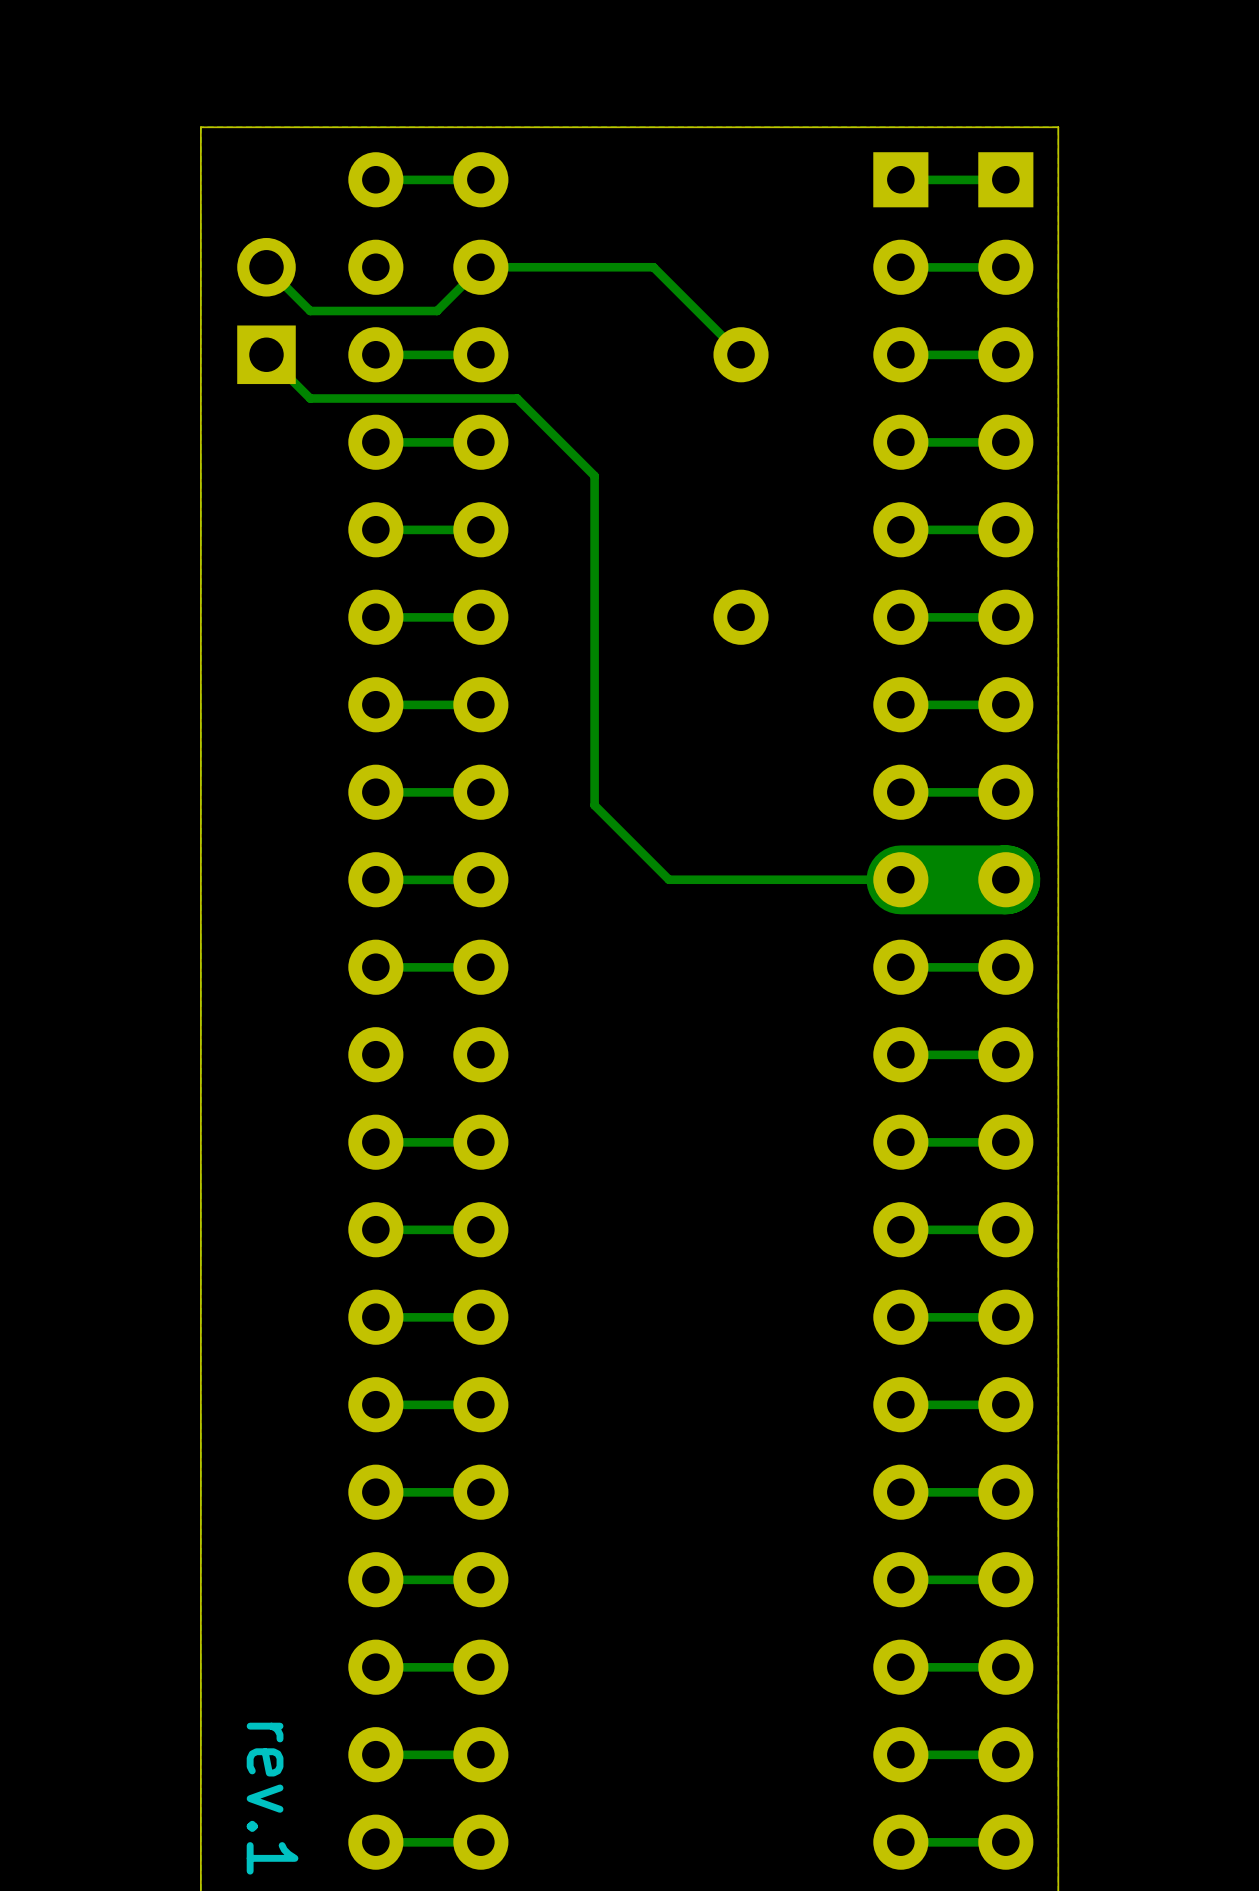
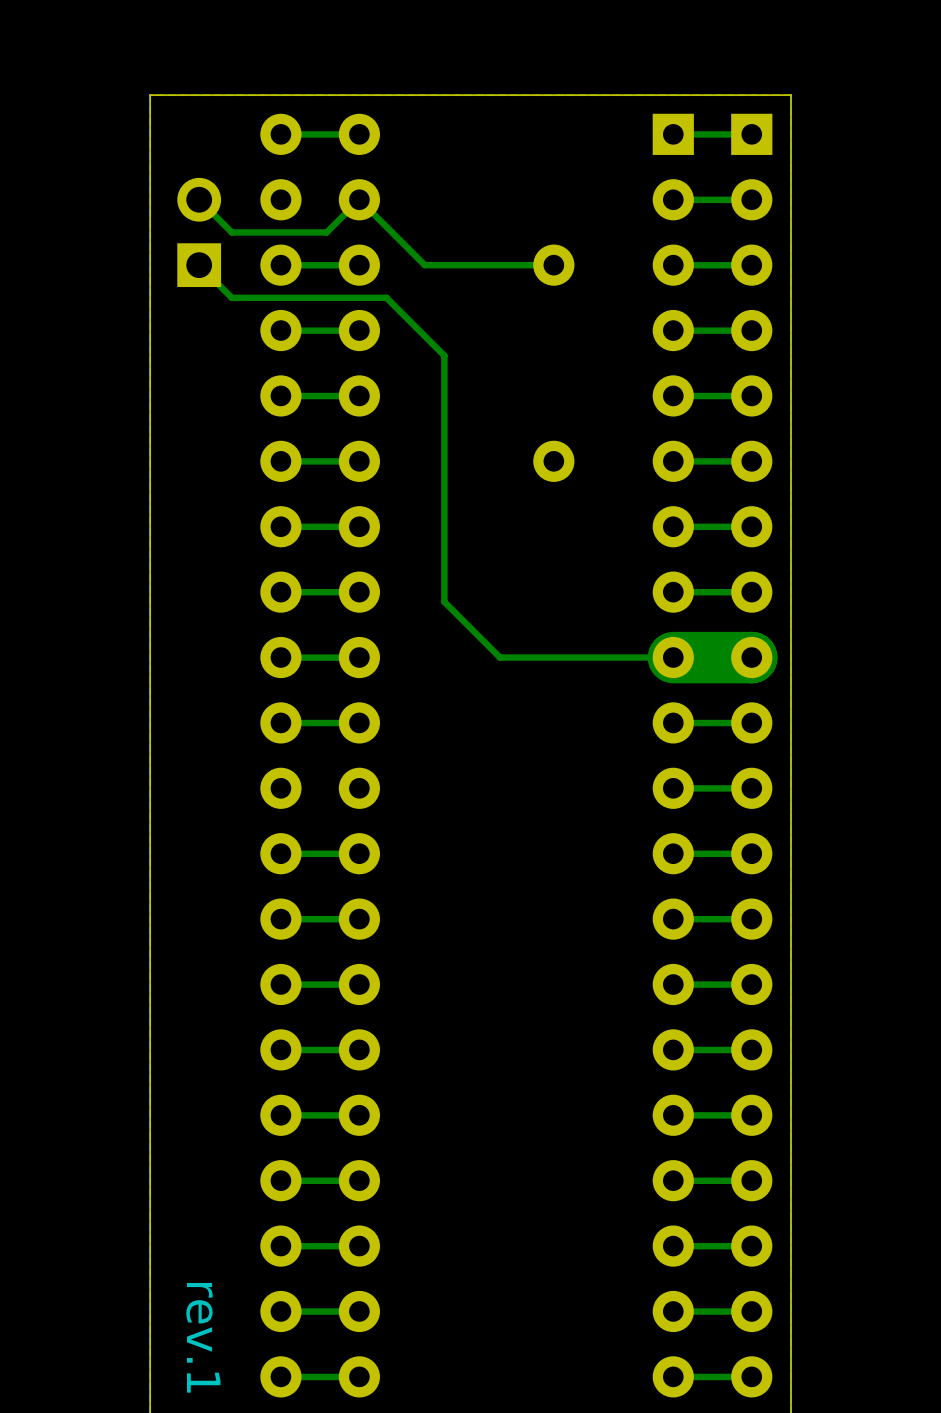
bottom track: (480, 267) (653, 267) (741, 354) -> (359, 199) (424, 265) (553, 265)

